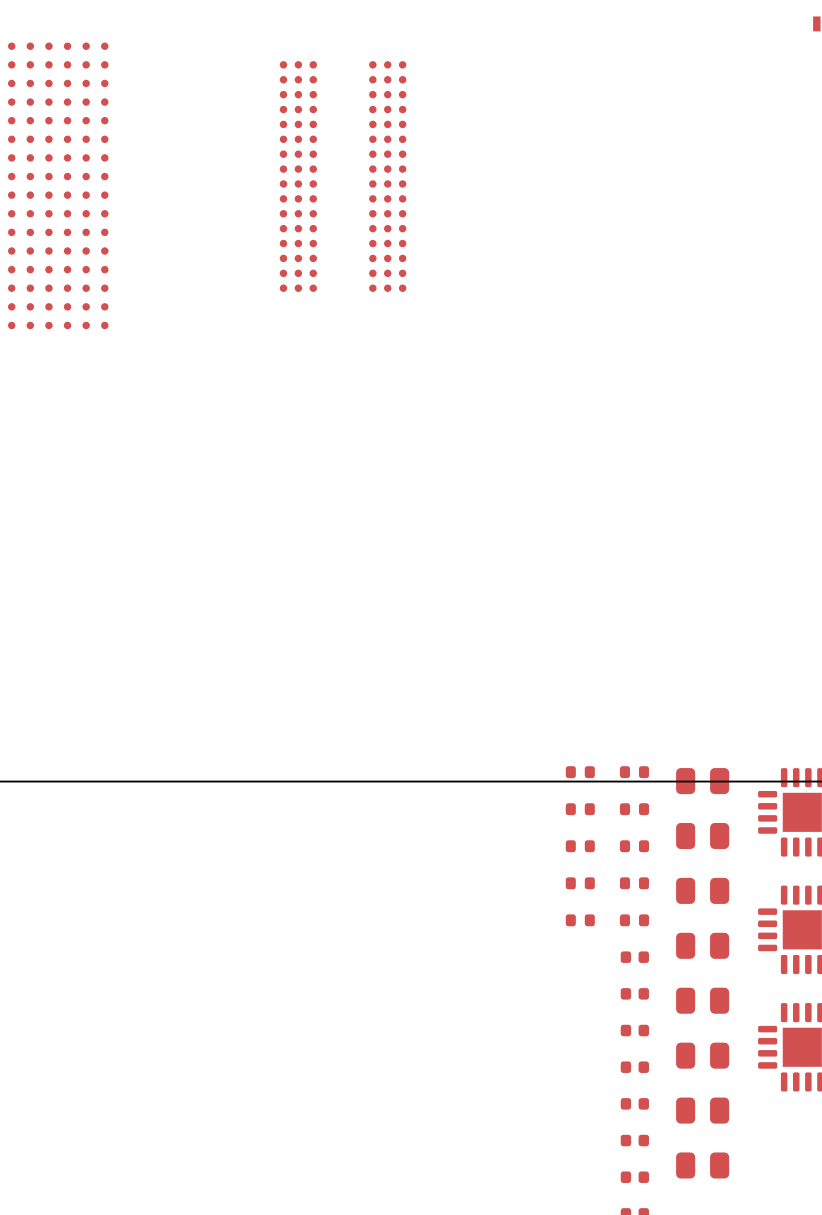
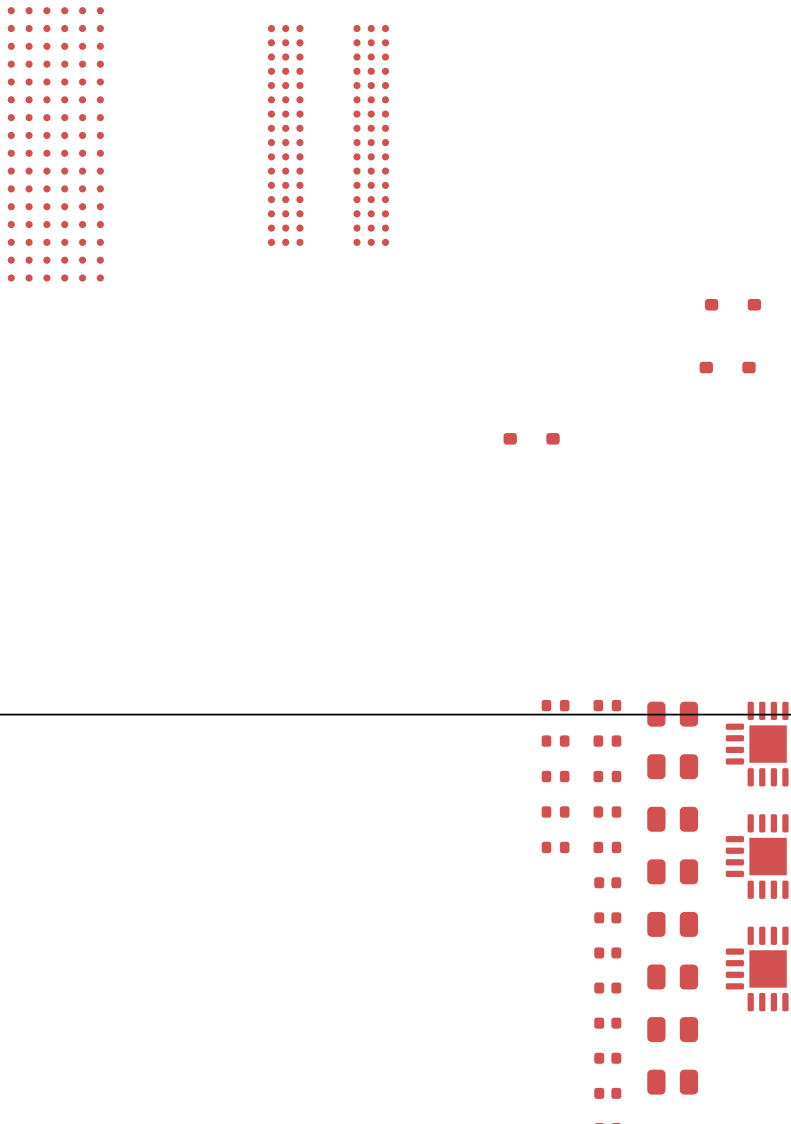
part: none -> (732, 304)
part: none -> (727, 367)
part: none -> (531, 438)

